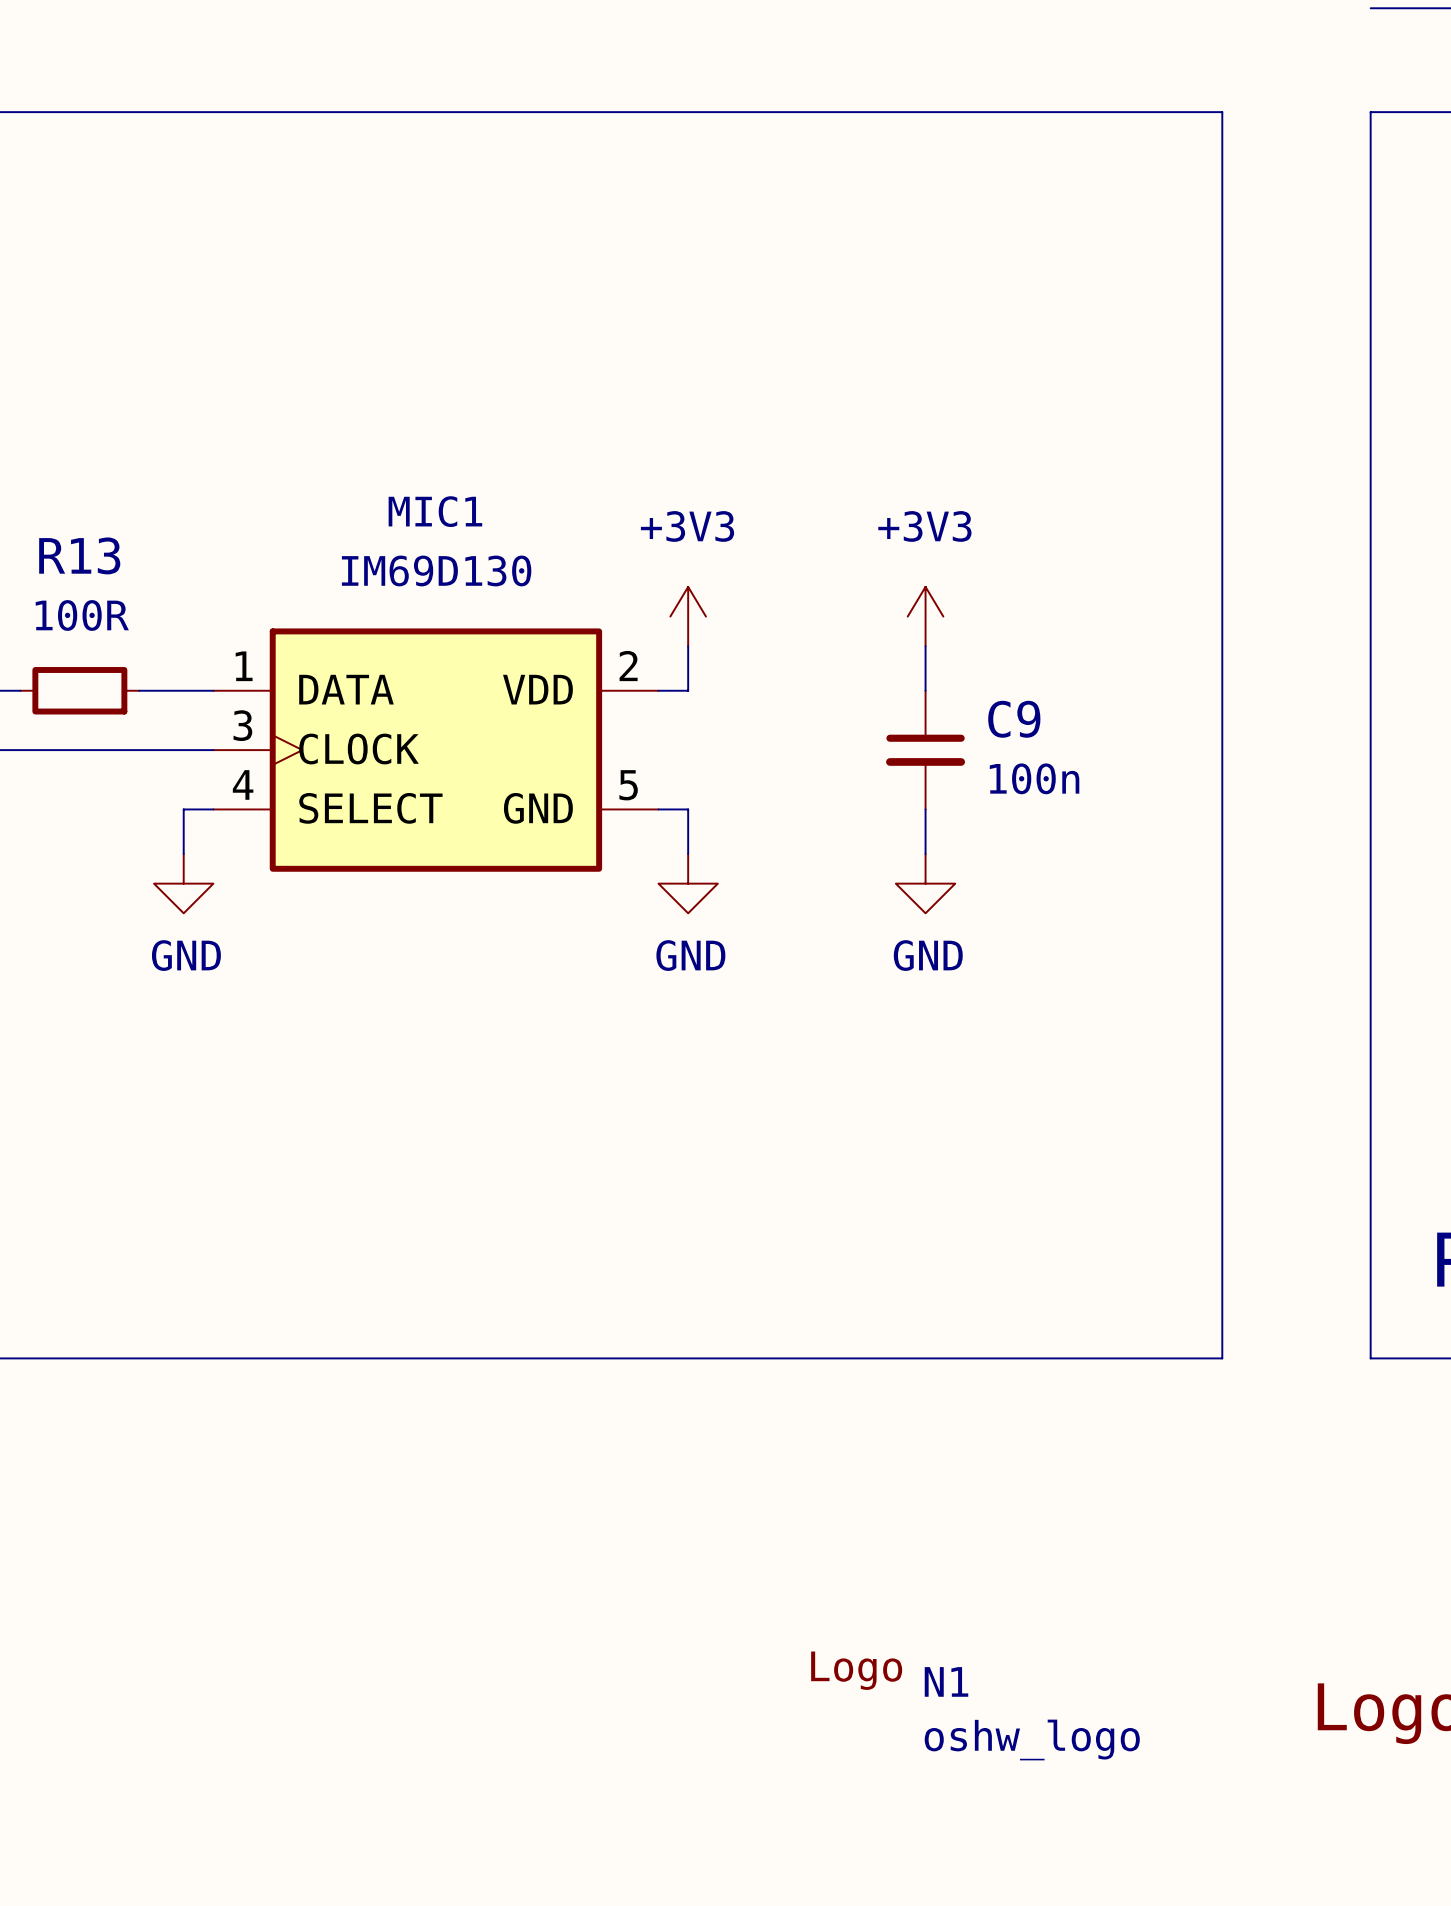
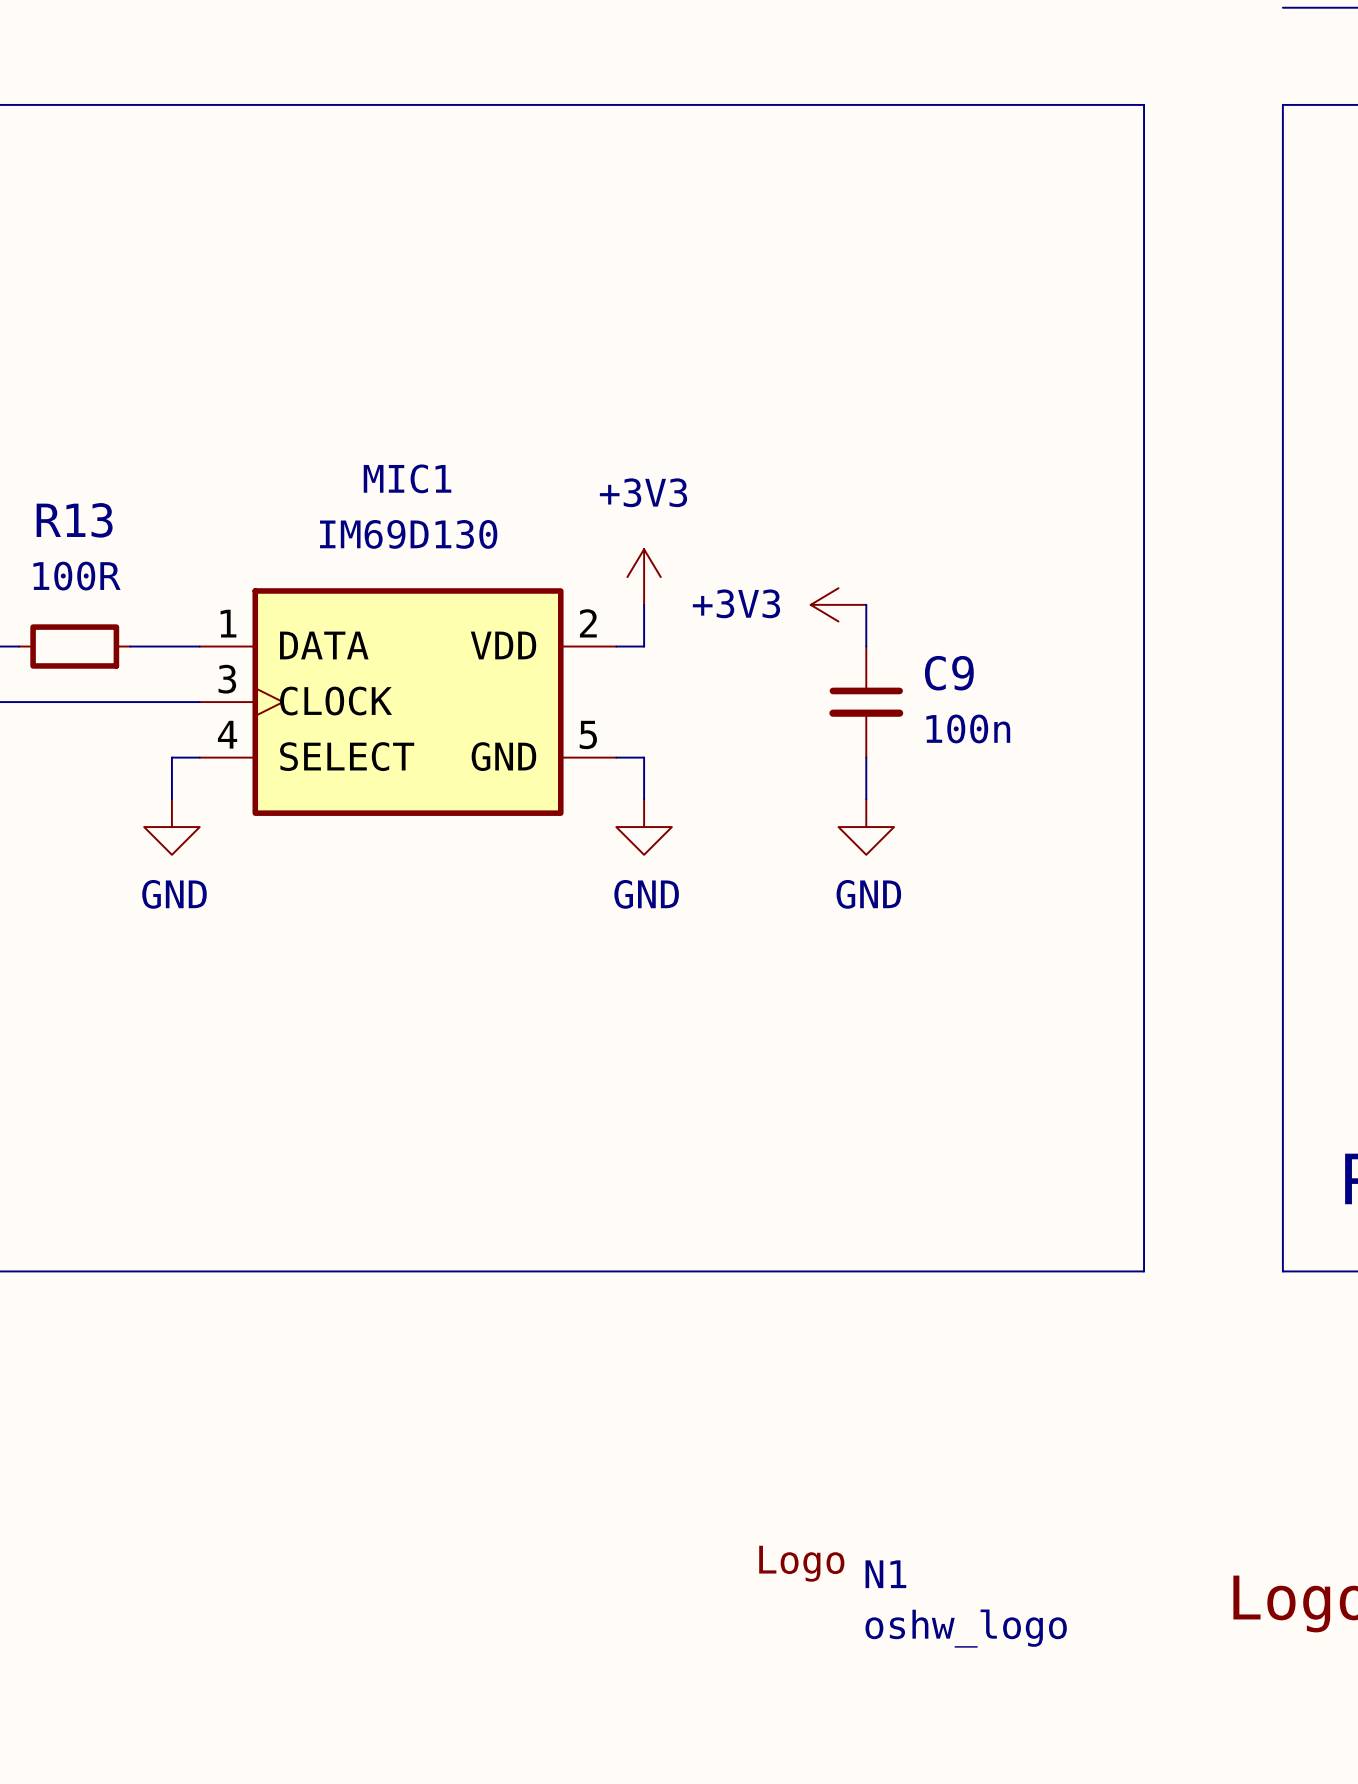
power symbol rotation: 0° (925, 616) -> 90° counterclockwise (838, 604)
power symbol position: +3V3 (925, 616) -> +3V3 (838, 604)

